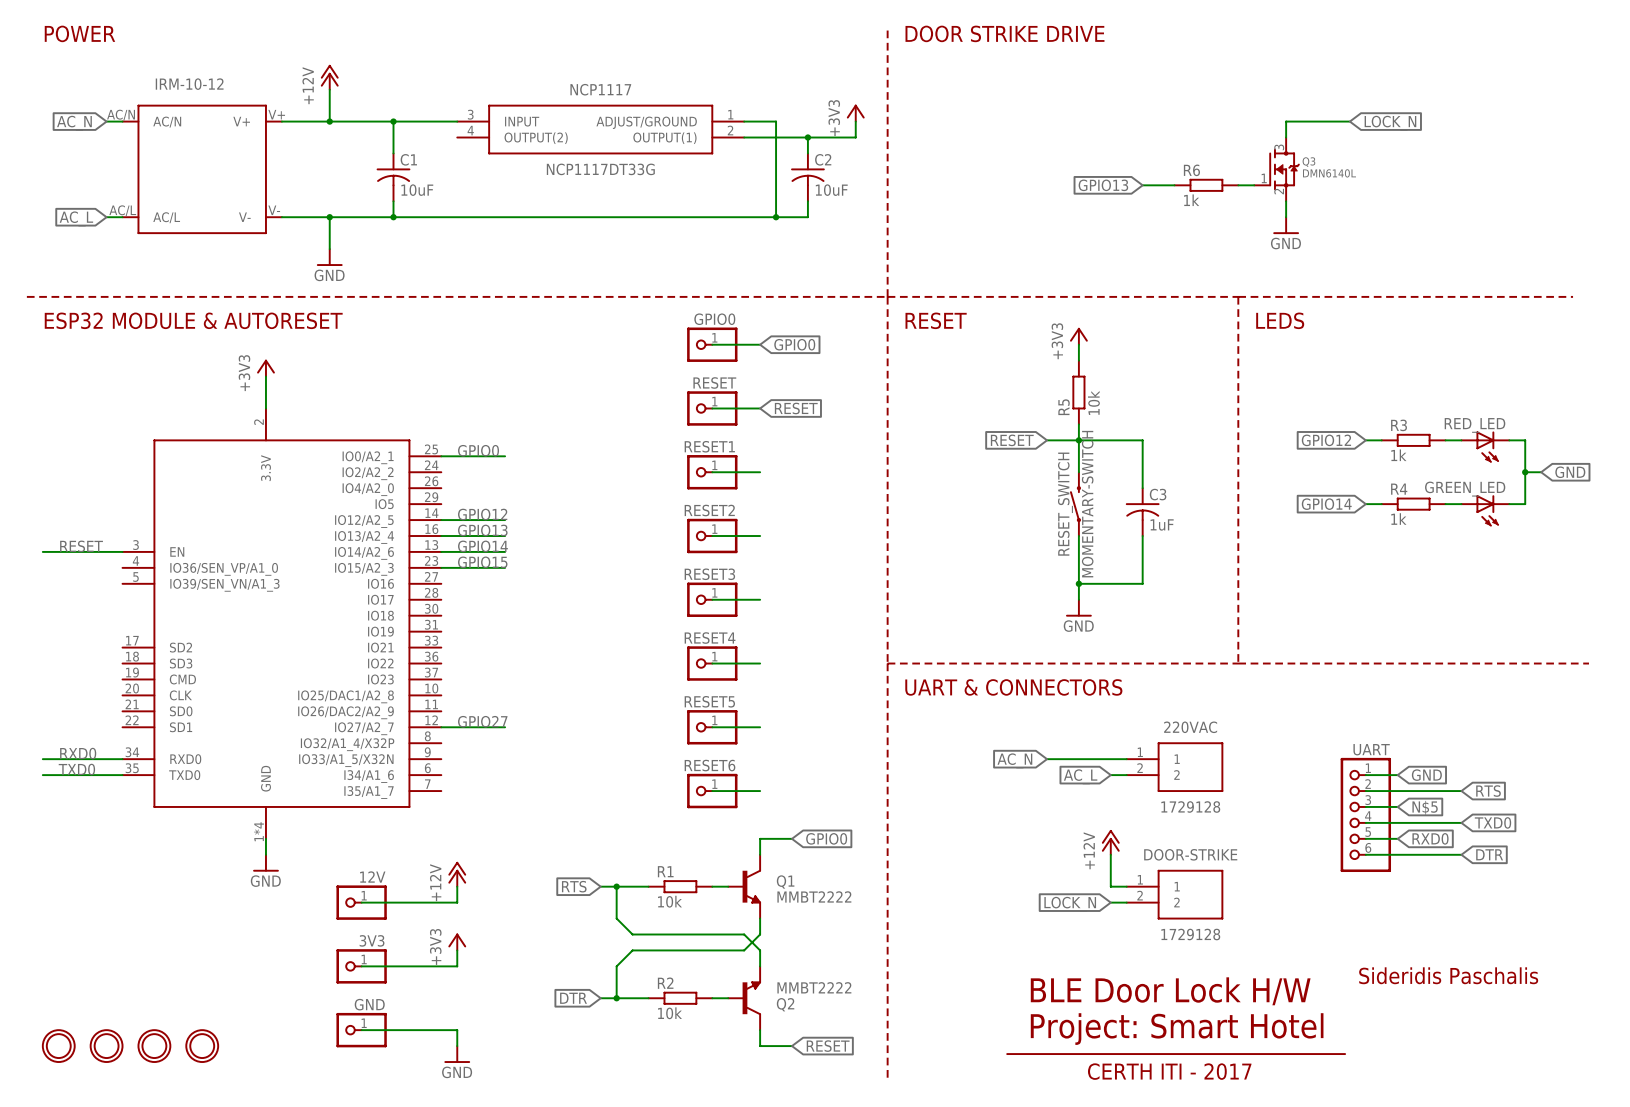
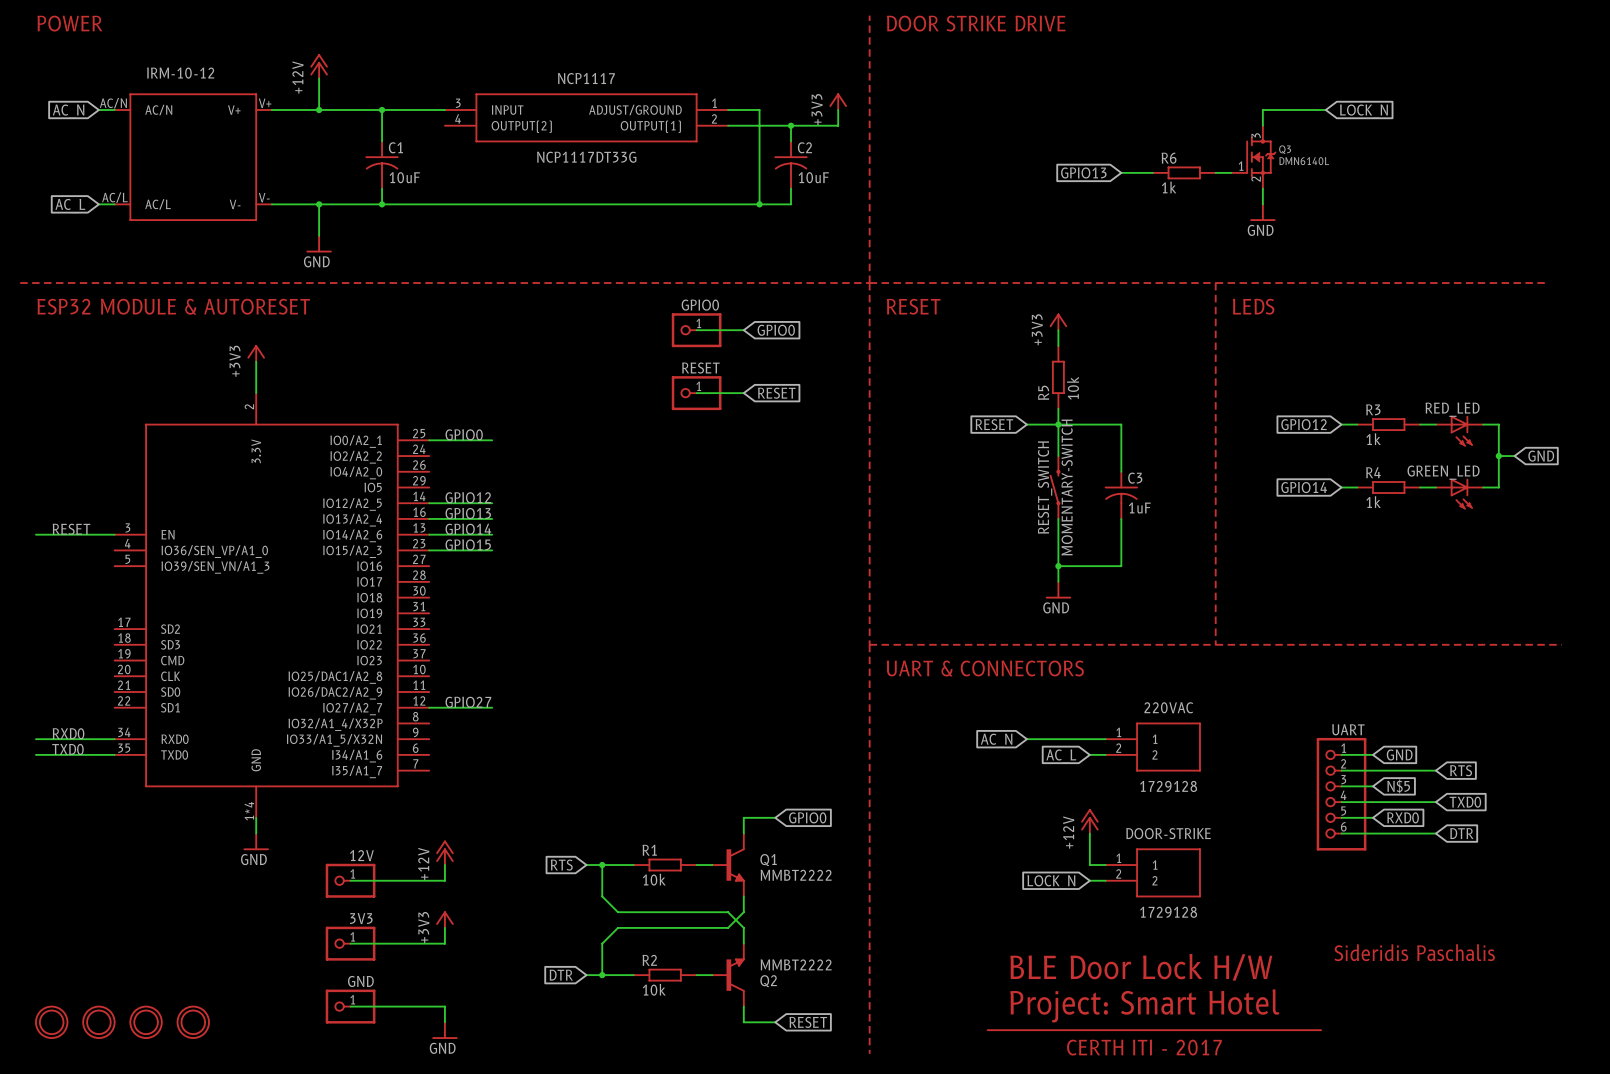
wire: (712, 472) (760, 472) -> none
RESET1: (712, 472) -> none
wire: (712, 536) (760, 536) -> none
RESET2: (712, 536) -> none
wire: (712, 599) (760, 599) -> none
RESET3: (712, 599) -> none
wire: (712, 663) (760, 663) -> none
RESET4: (712, 663) -> none
wire: (712, 727) (760, 727) -> none
RESET5: (712, 727) -> none
wire: (712, 791) (760, 791) -> none
RESET6: (712, 791) -> none

